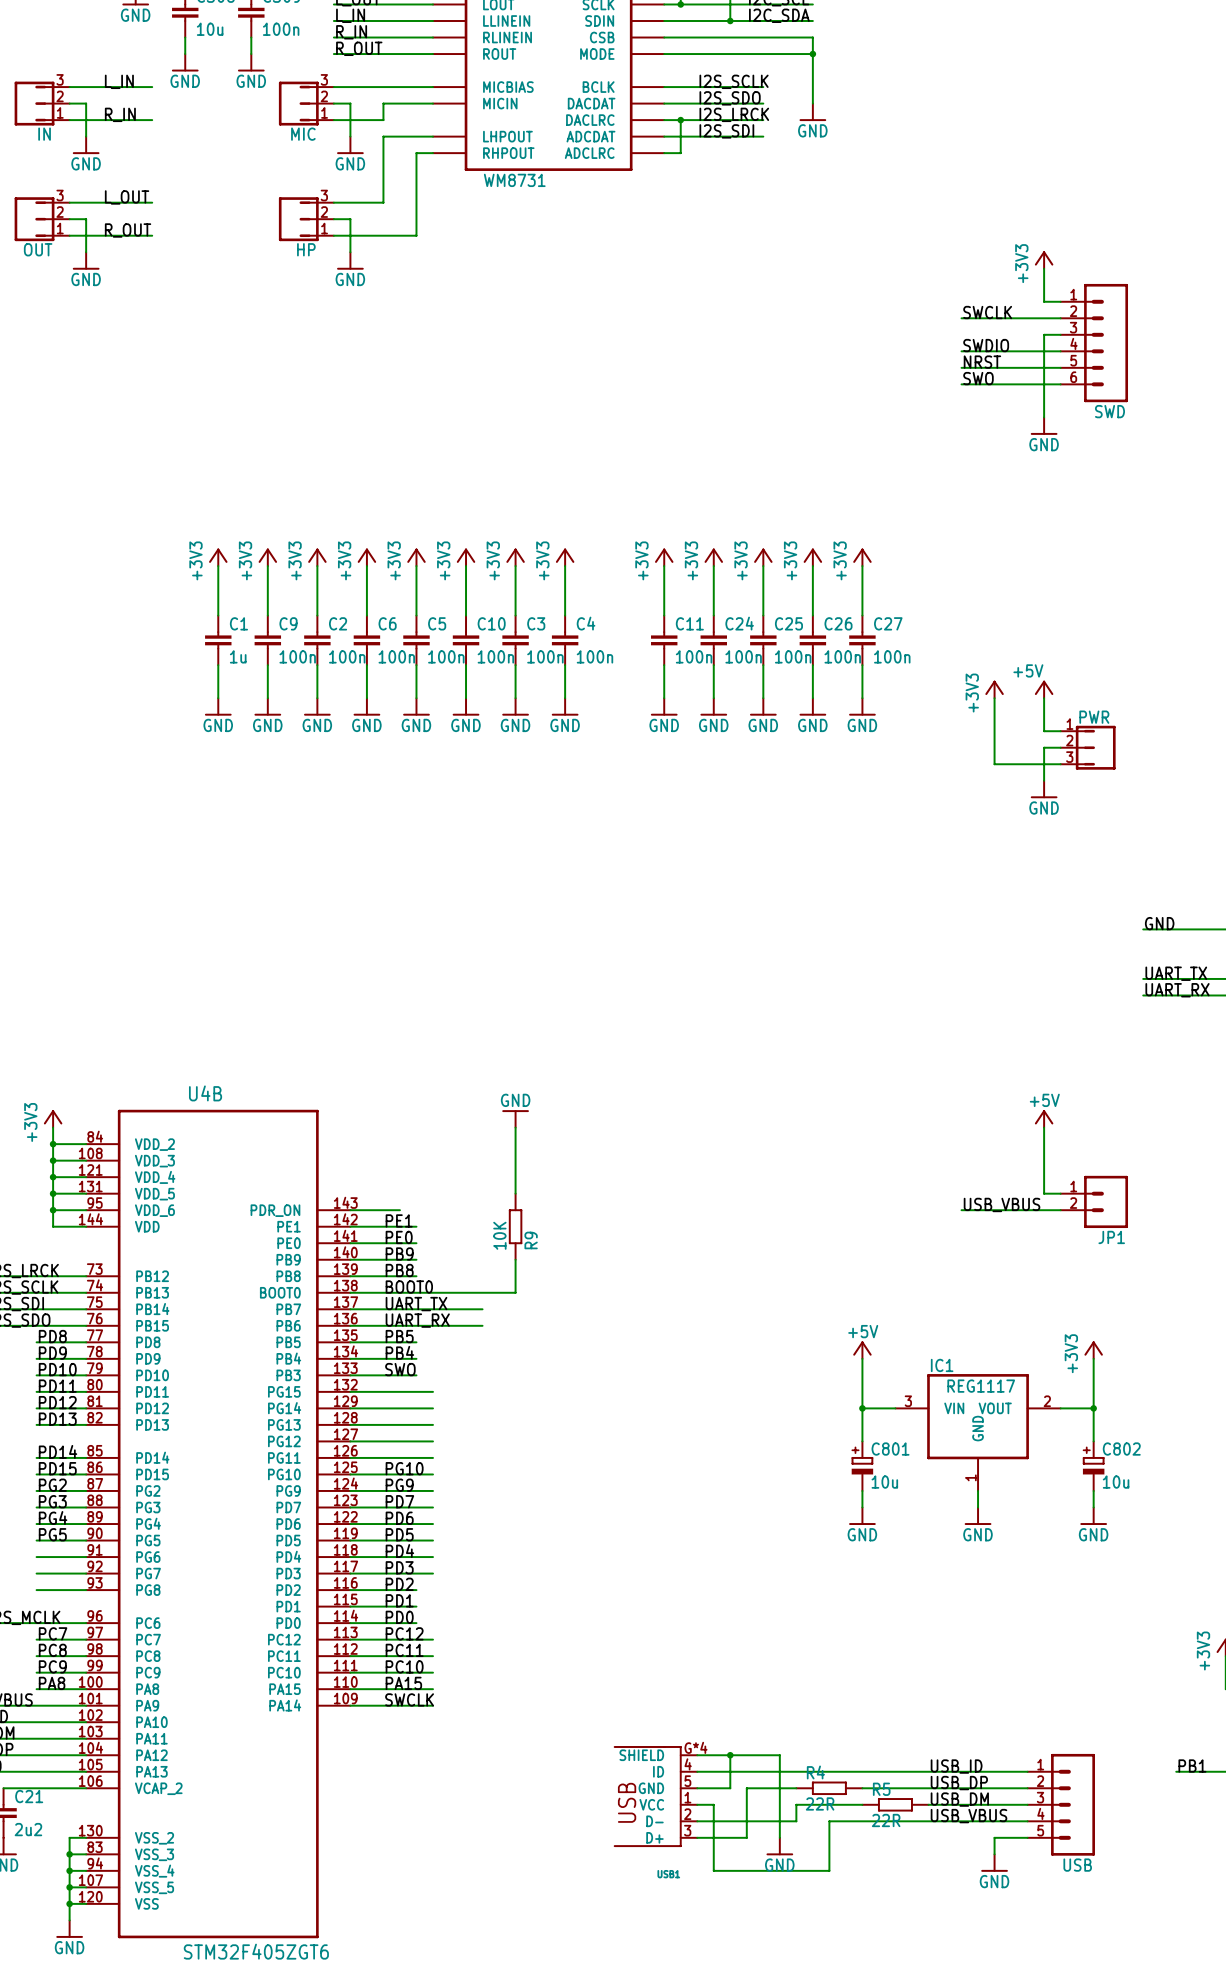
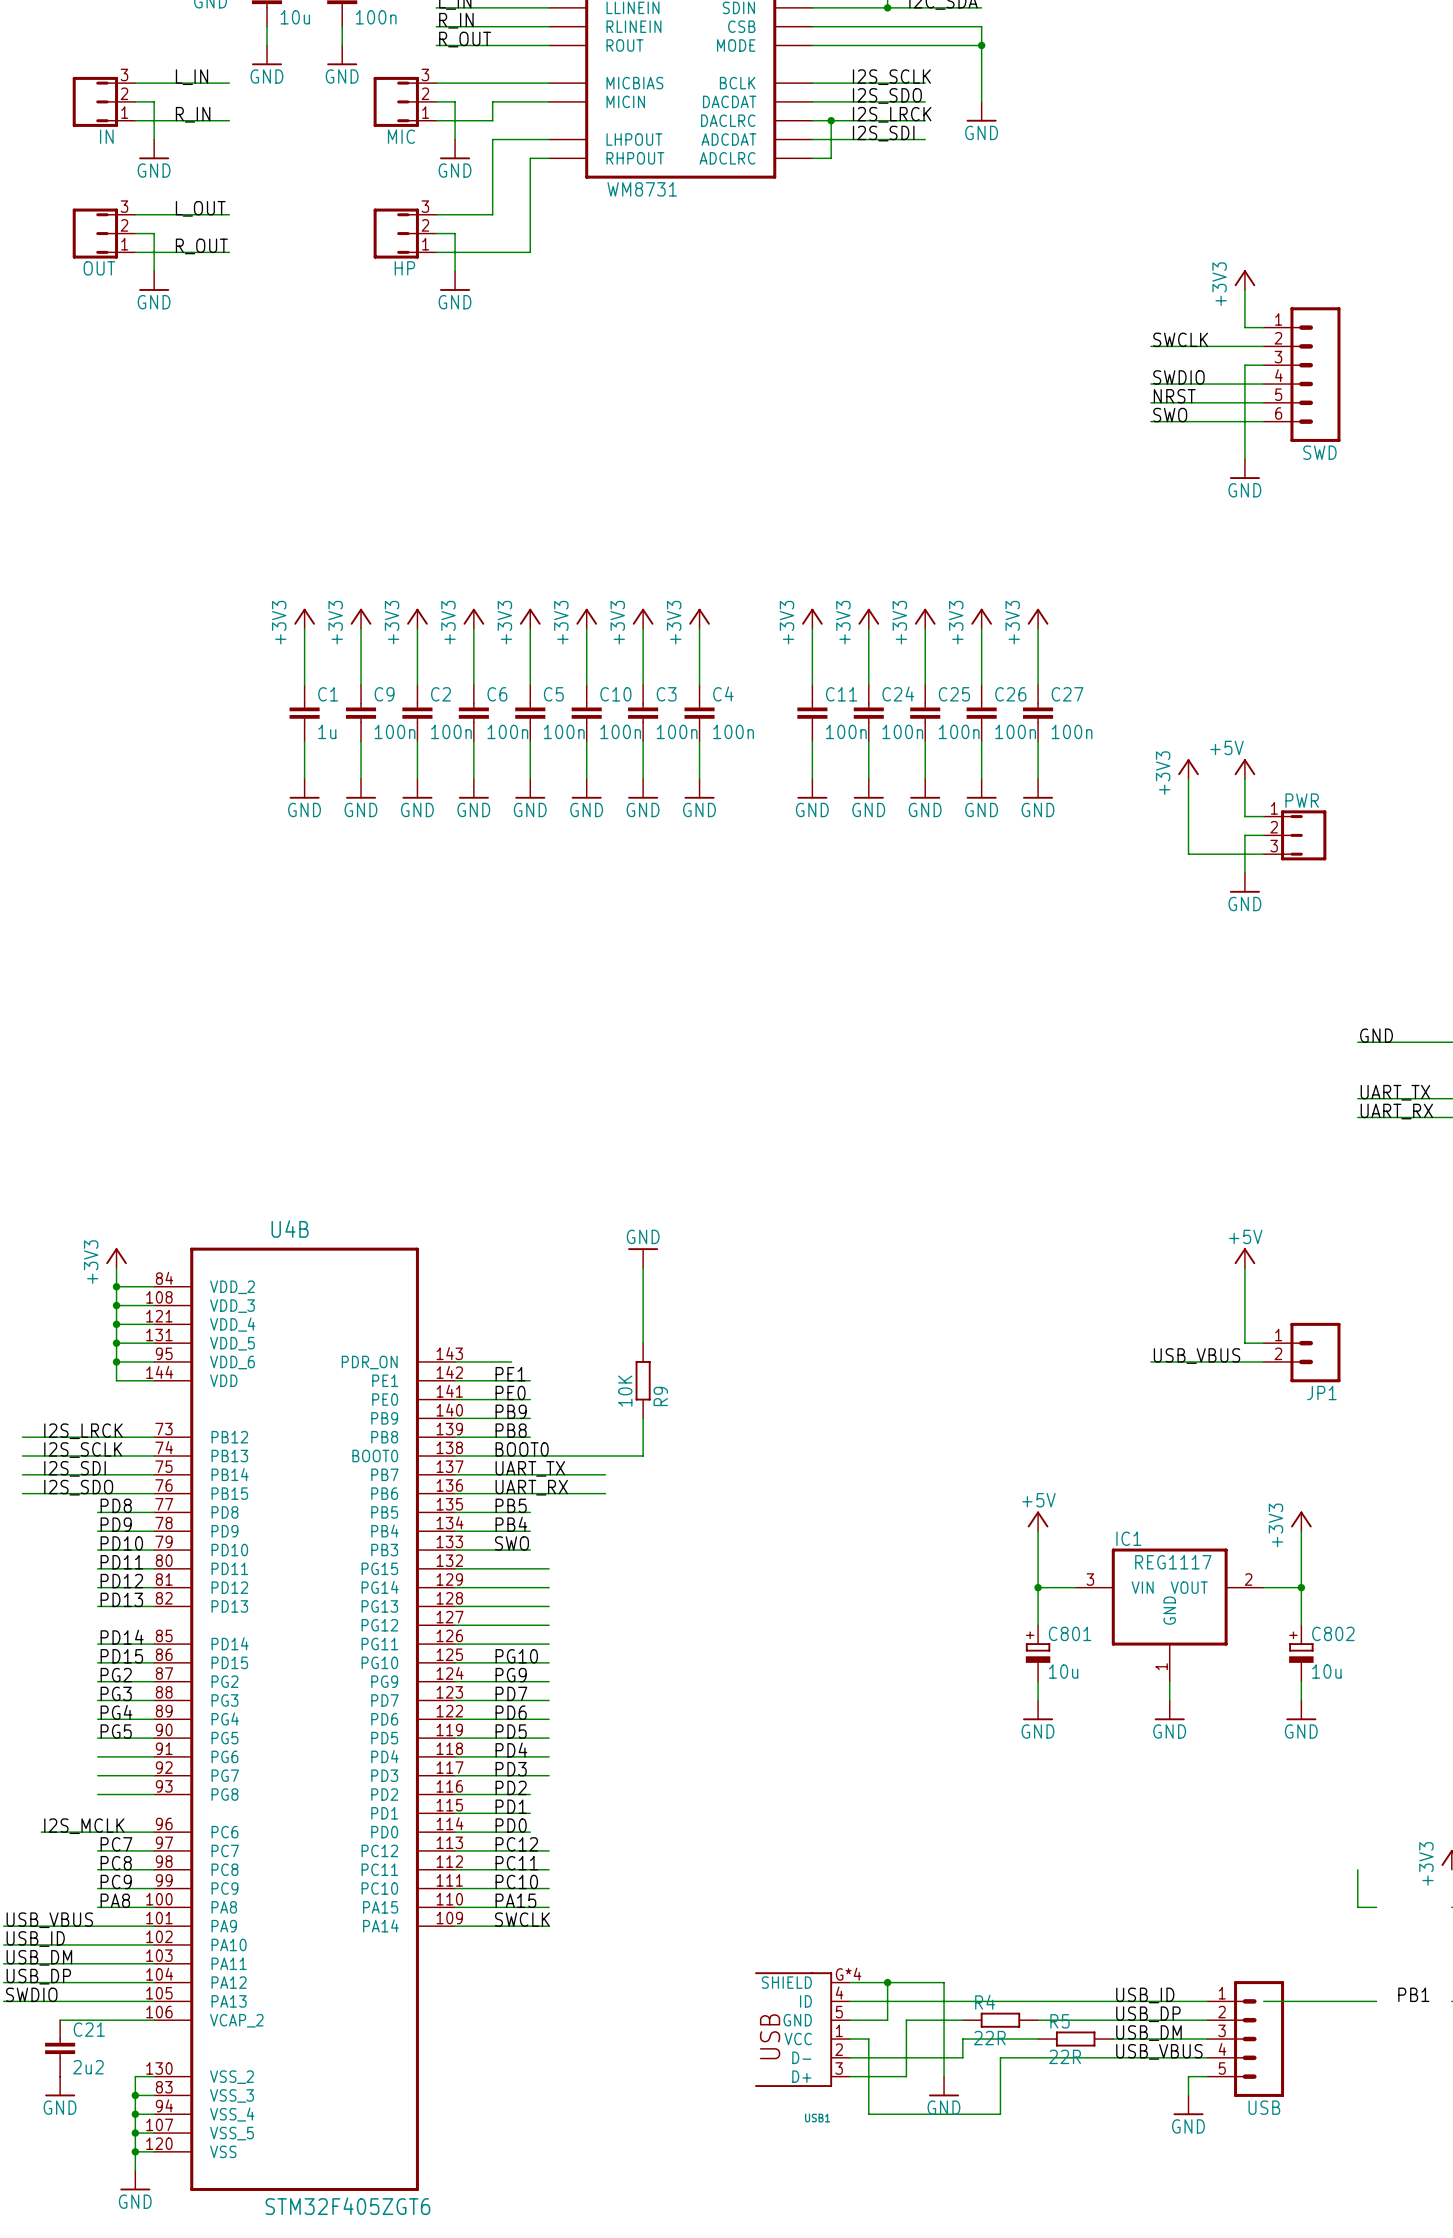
wire: none -> (1357, 1869) (1357, 1907) (1376, 1907)
wire: (1225, 1656) (1225, 1689) -> none
wire: none -> (1263, 2001) (1376, 2001)
wire: (1176, 1771) (1225, 1771) -> none
USB position: (1061, 1804) -> (1245, 2039)

